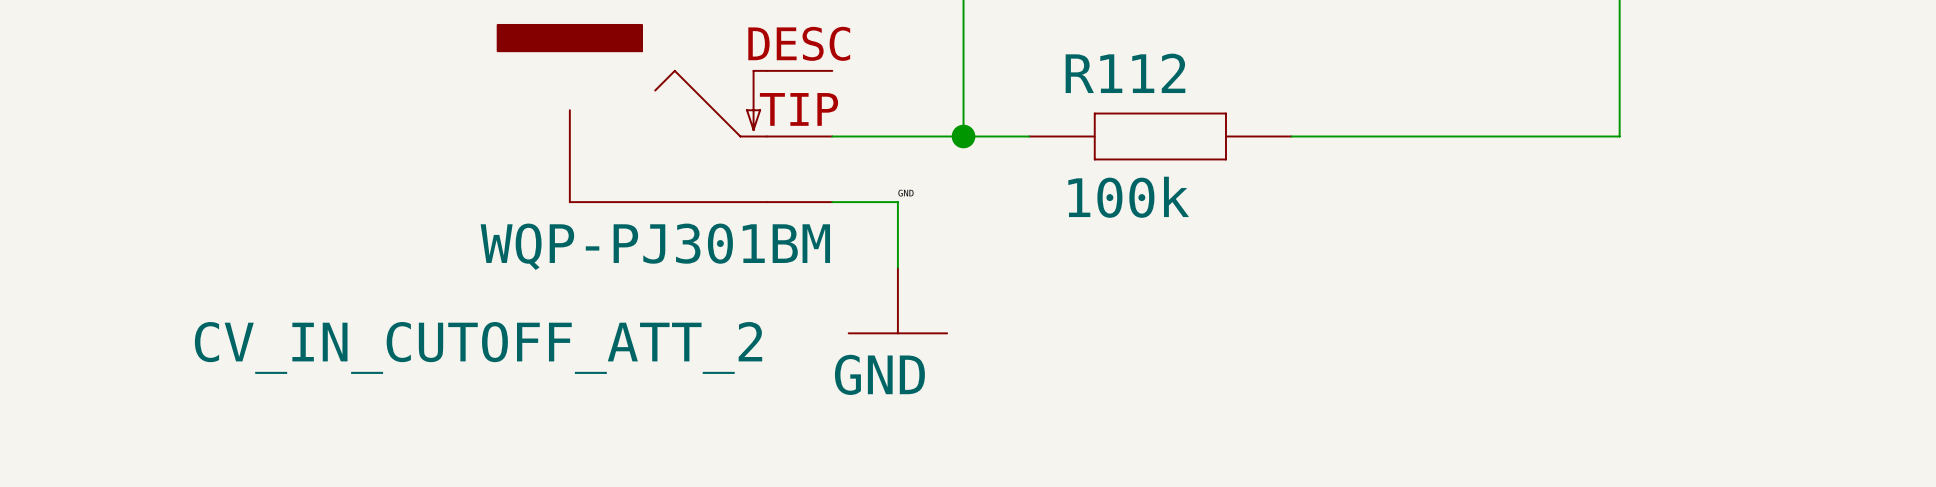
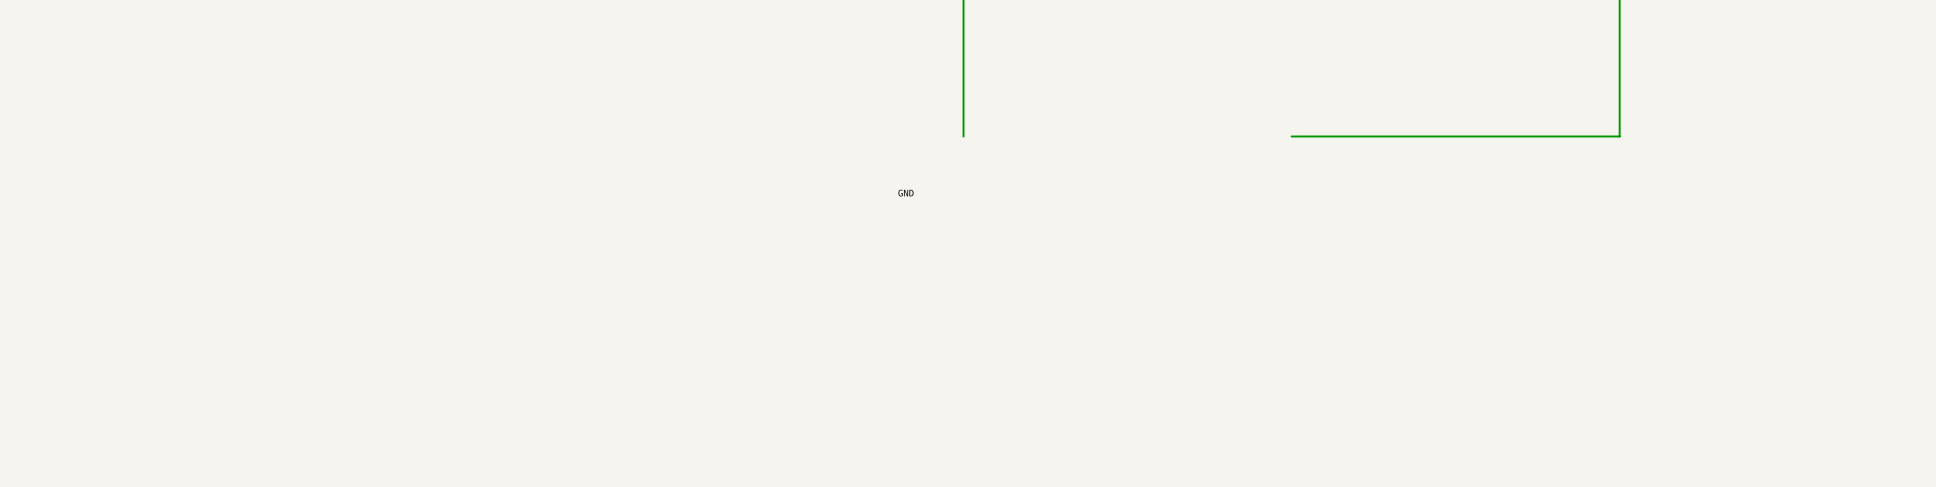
CV_IN_CUTOFF_ATT_2: WQP-PJ301BM (664, 113) -> none
wire: (832, 136) (1029, 136) -> none
junction: (963, 136) -> none
R112: 100k (1160, 136) -> none
wire: (832, 202) (897, 202) (897, 267) -> none
power symbol: GND (897, 300) -> none

